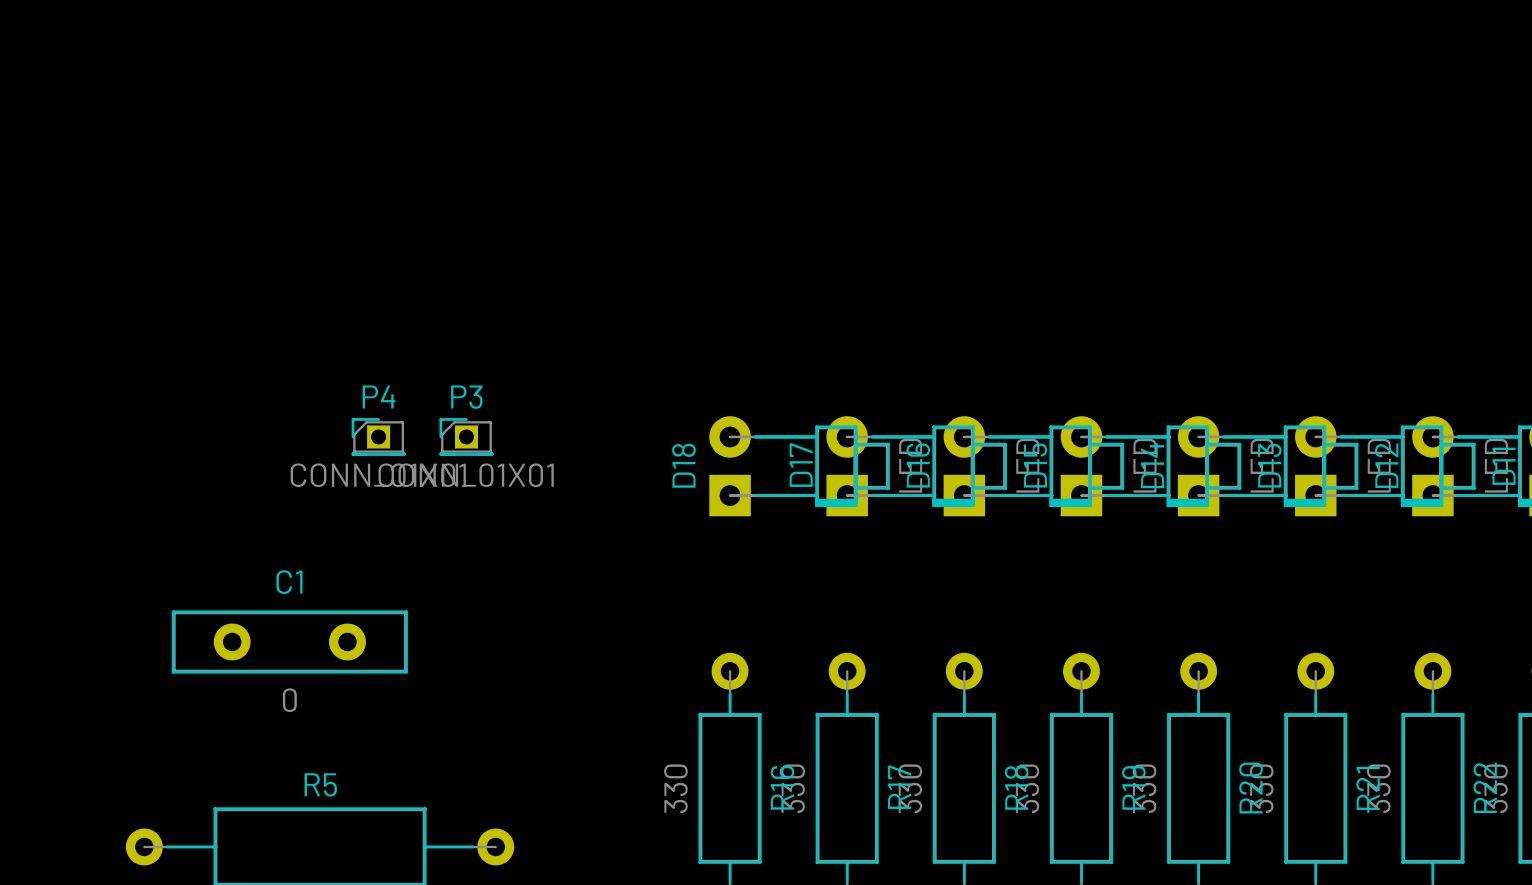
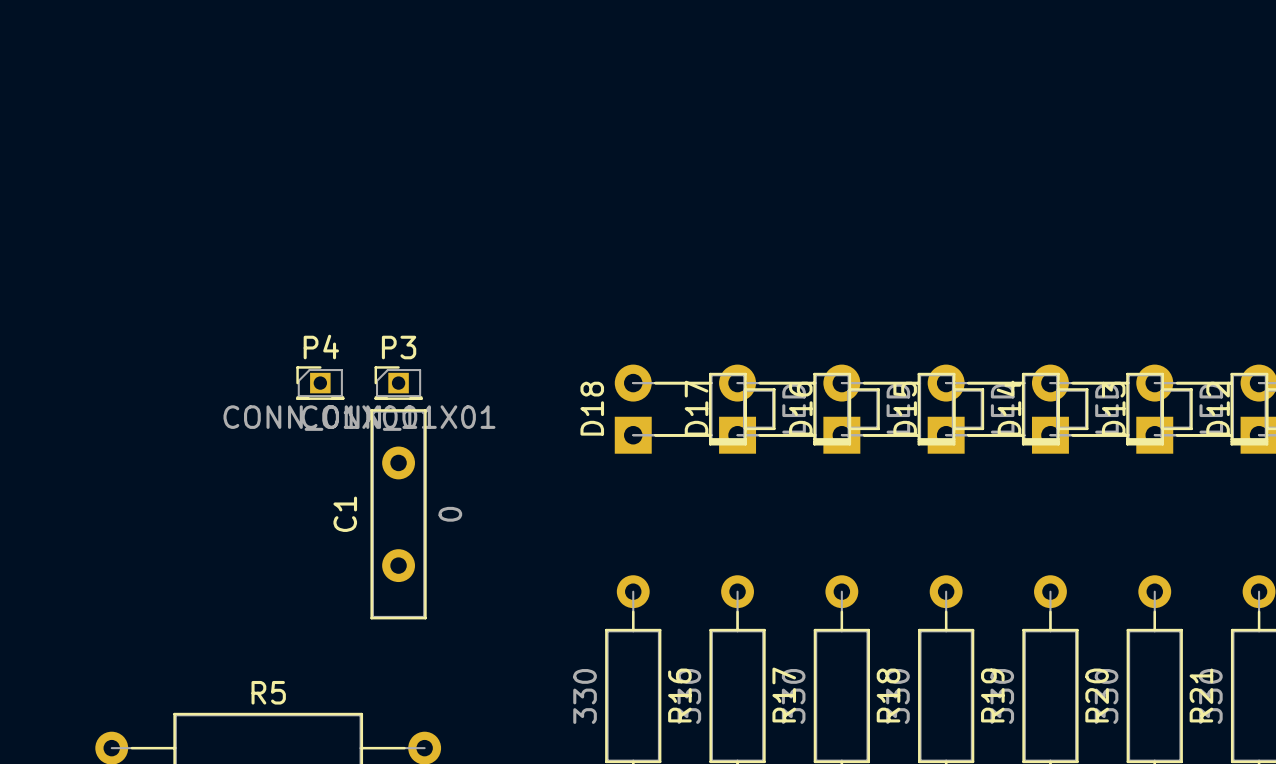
C1 name position: C1 (289, 582) -> C1 (345, 514)
C1 rotation: 0° (289, 641) -> 90° clockwise (398, 514)
C1 position: (289, 641) -> (398, 514)
C1 value position: 0 (289, 700) -> 0 (450, 514)

